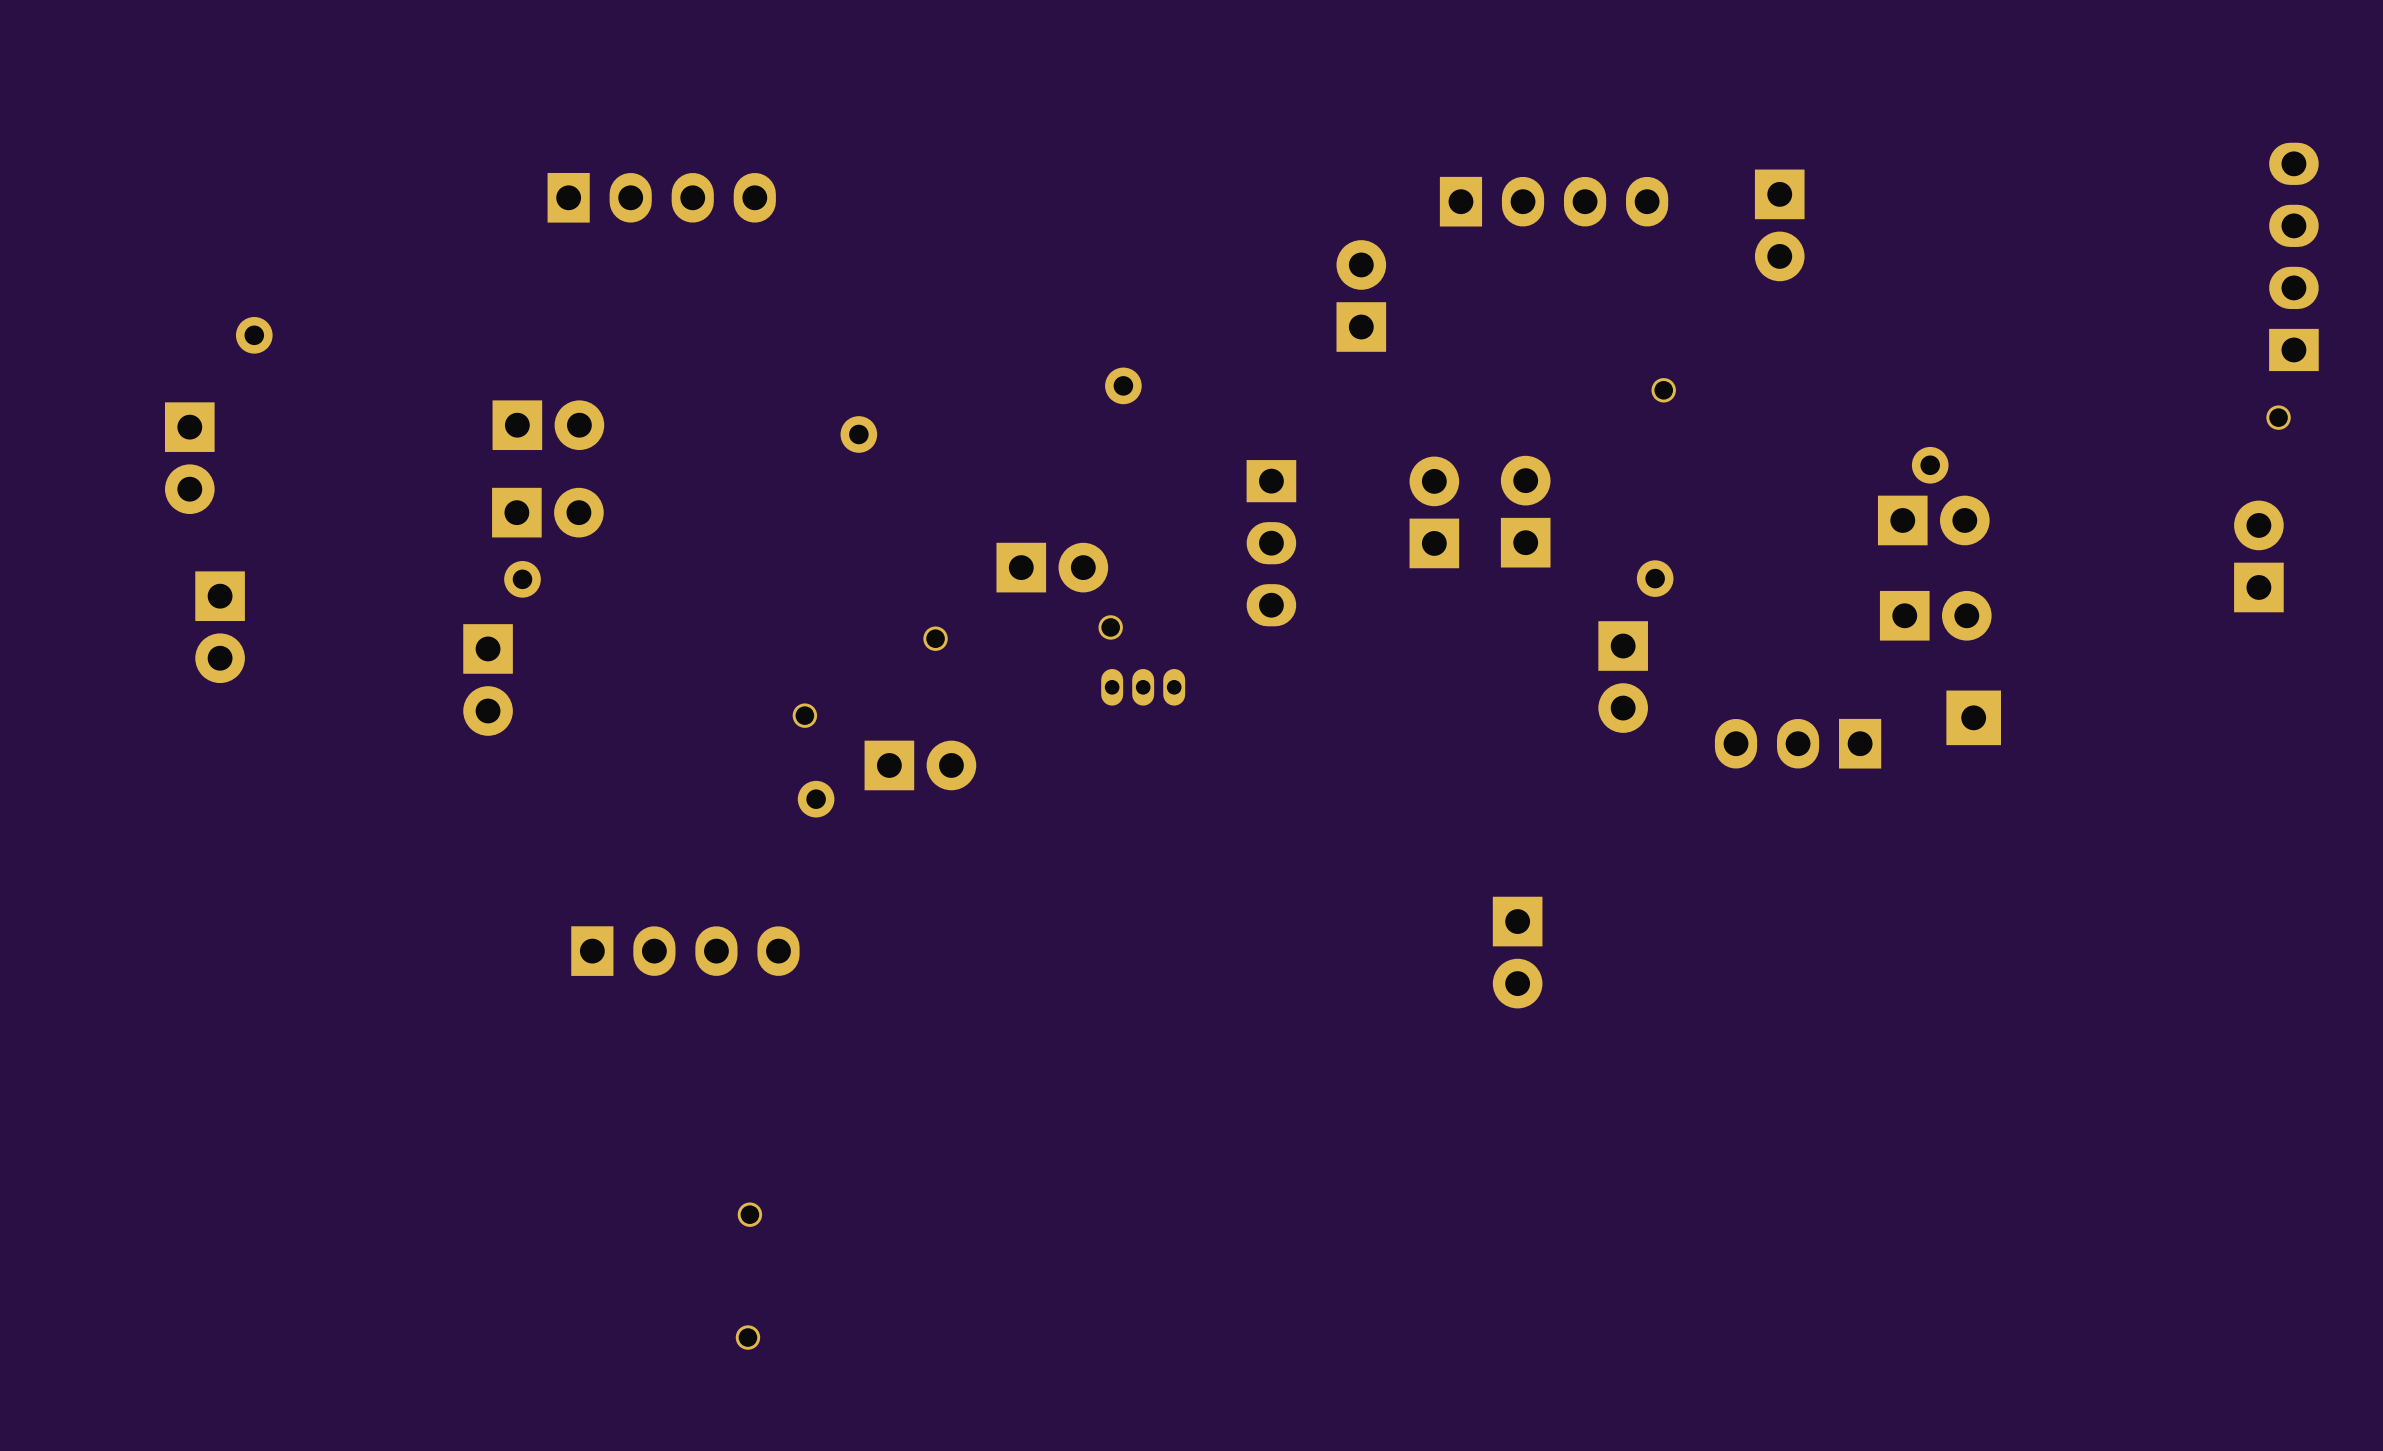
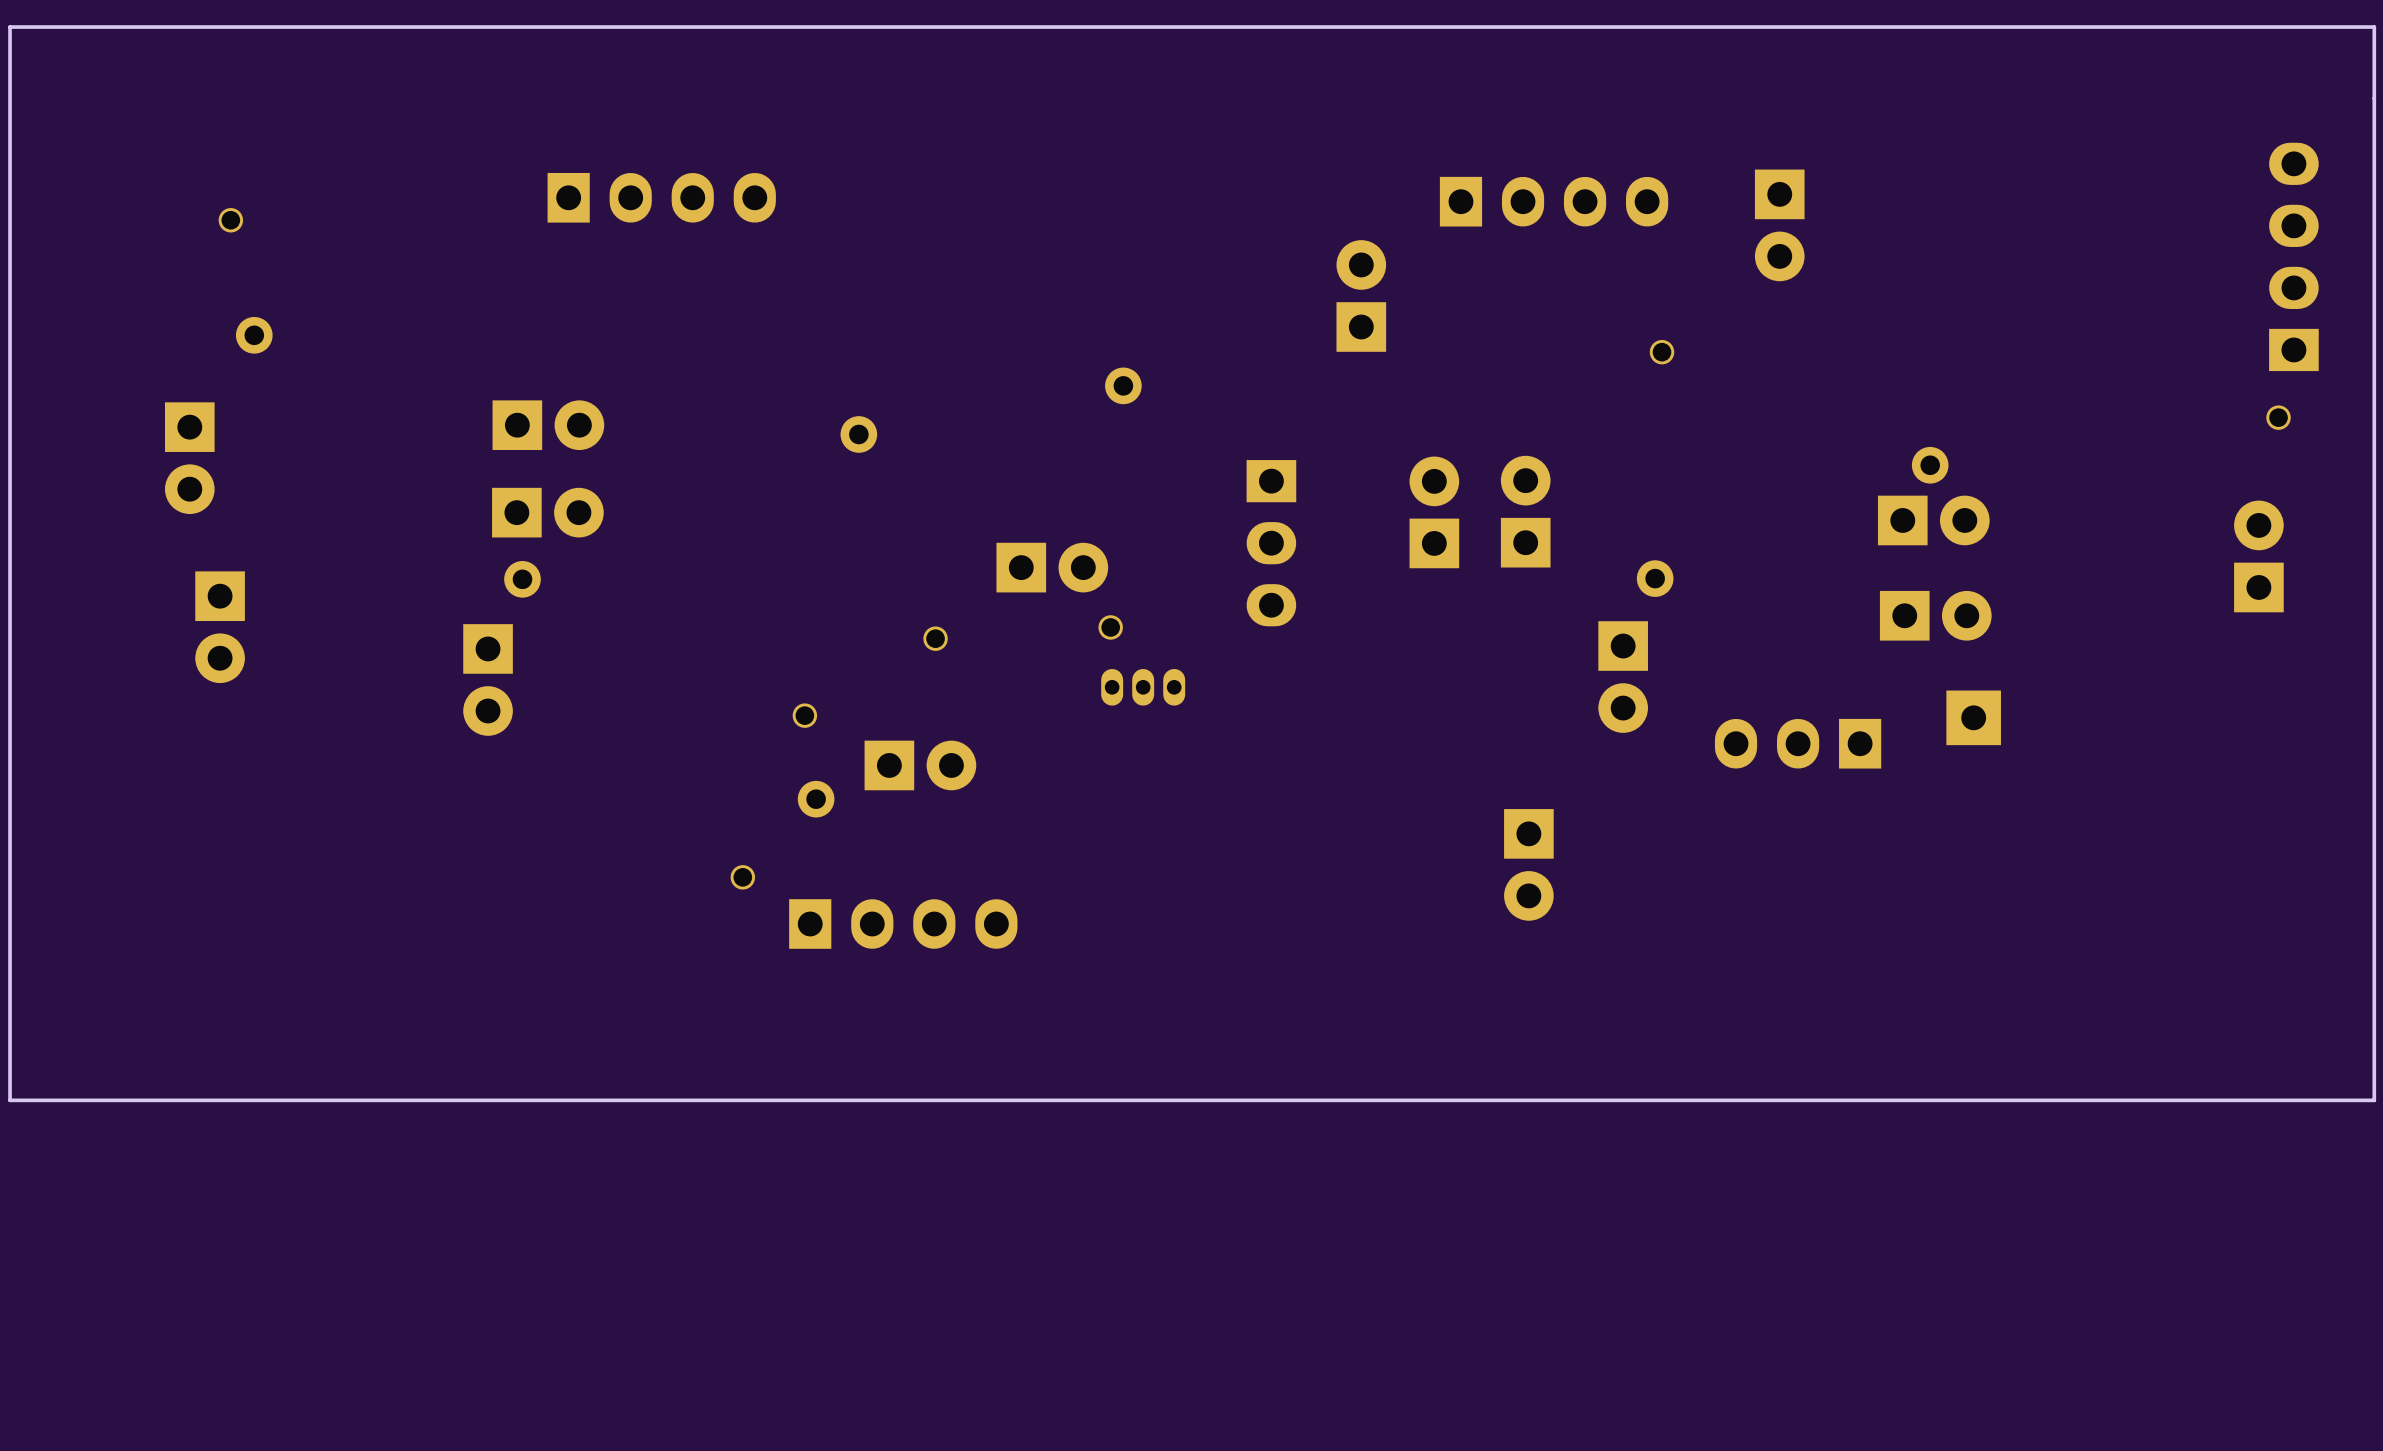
board edge: none -> (2374, 27) (2374, 1100) (10, 1100) (10, 27) (2374, 27)
part: none -> (230, 220)
part position: (1663, 390) -> (1662, 352)
part: none -> (742, 877)
part position: (685, 951) -> (903, 923)
part position: (1517, 952) -> (1528, 864)
part: (749, 1214) -> none
part: (747, 1337) -> none

